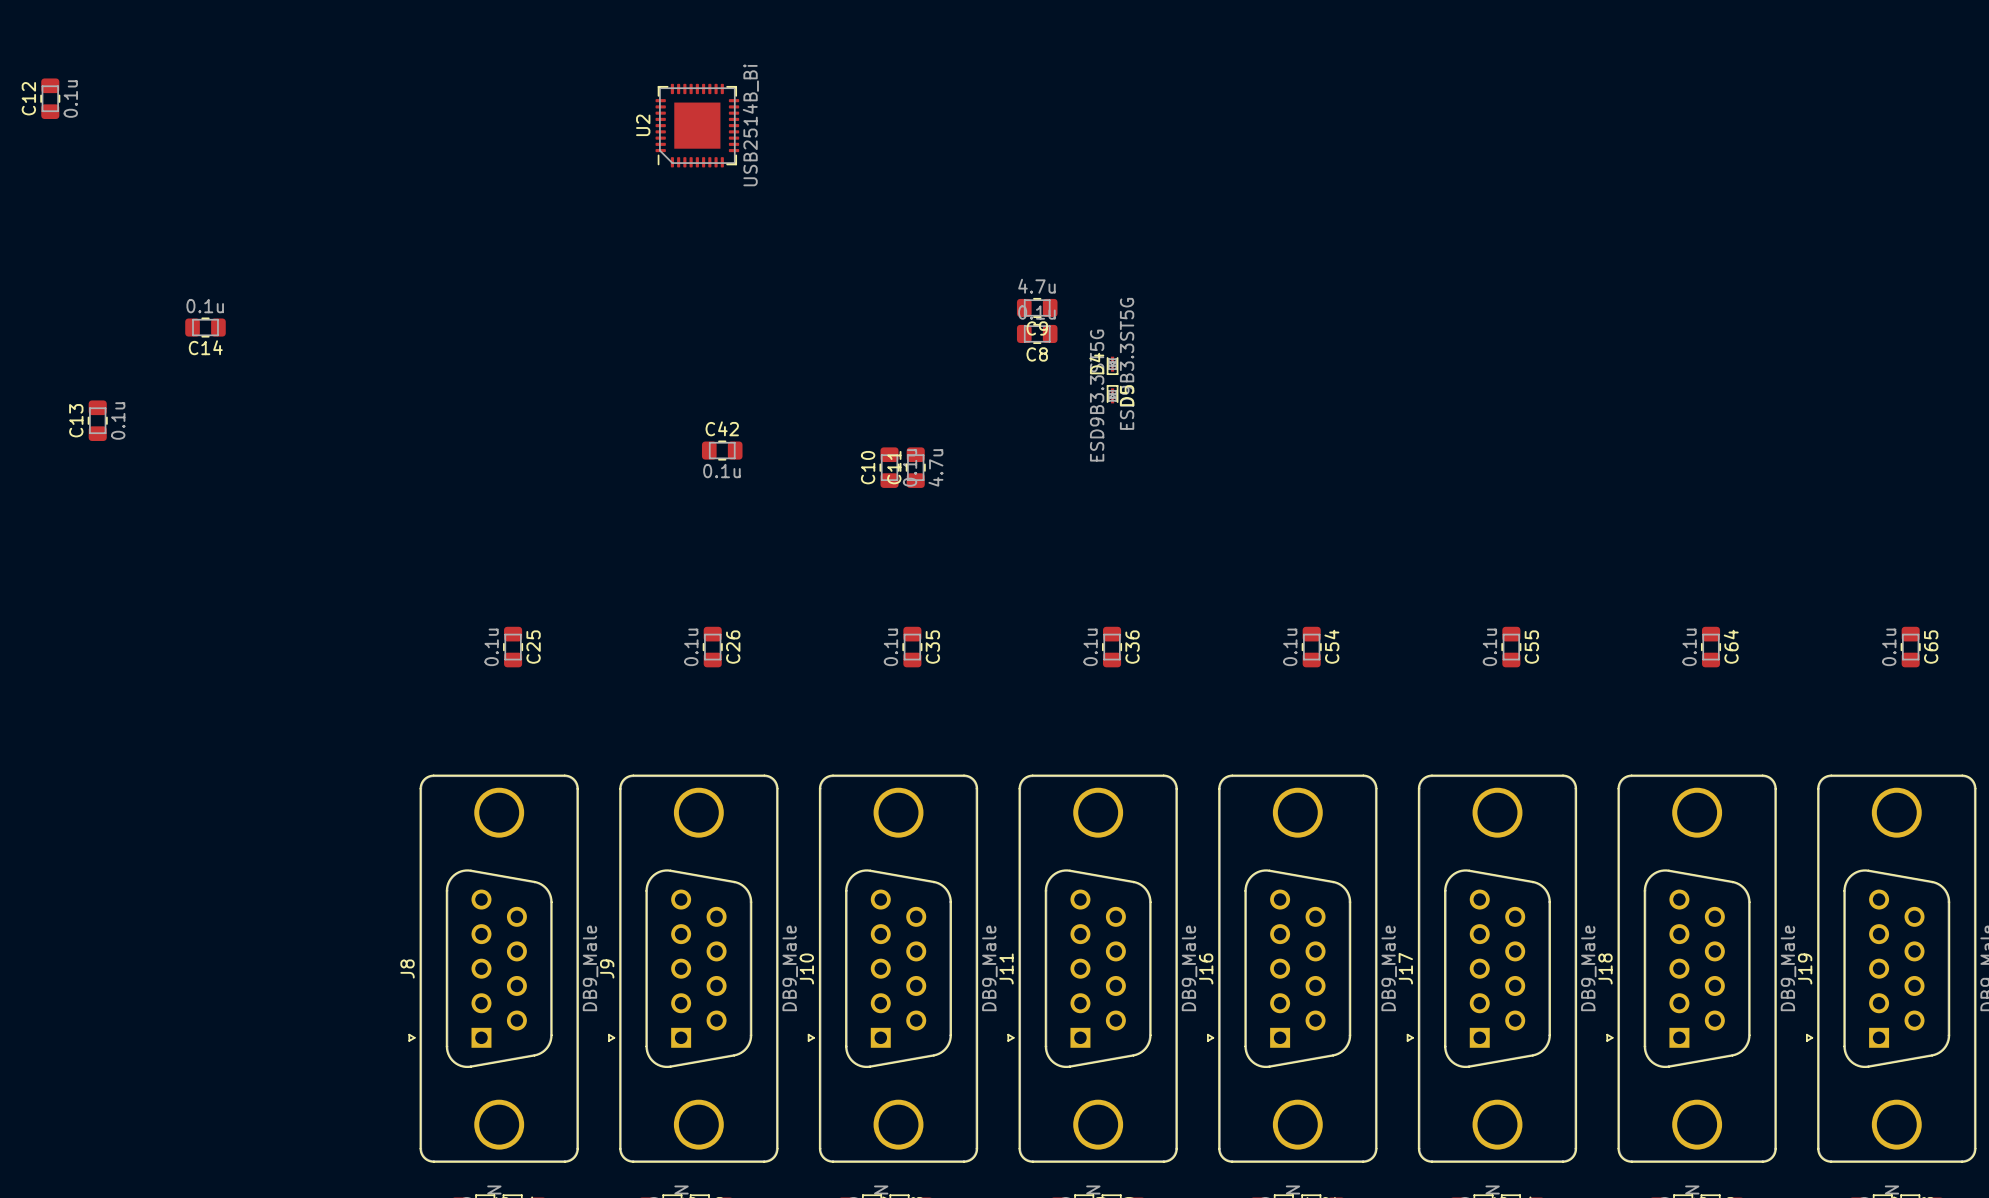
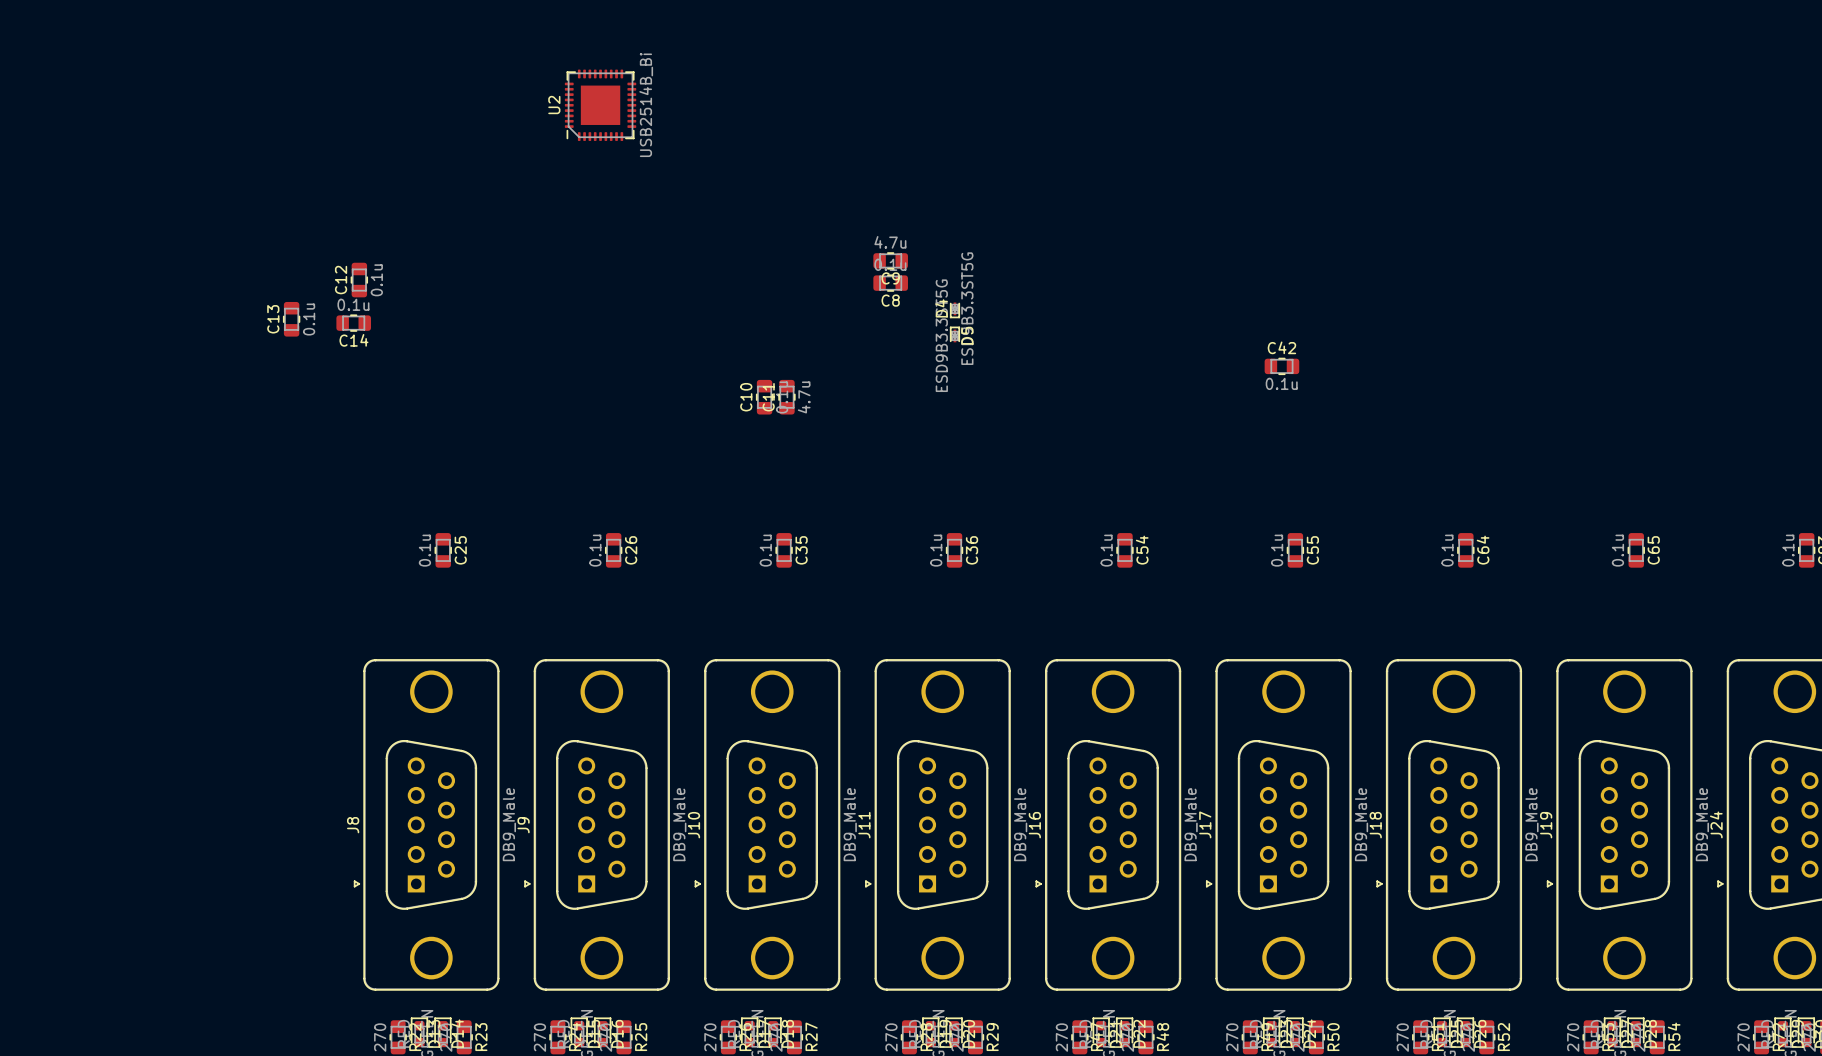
C12 position: (50, 98) -> (359, 280)
C14 position: (205, 327) -> (353, 323)
C13 position: (97, 420) -> (291, 319)
C42 position: (722, 450) -> (1281, 366)

